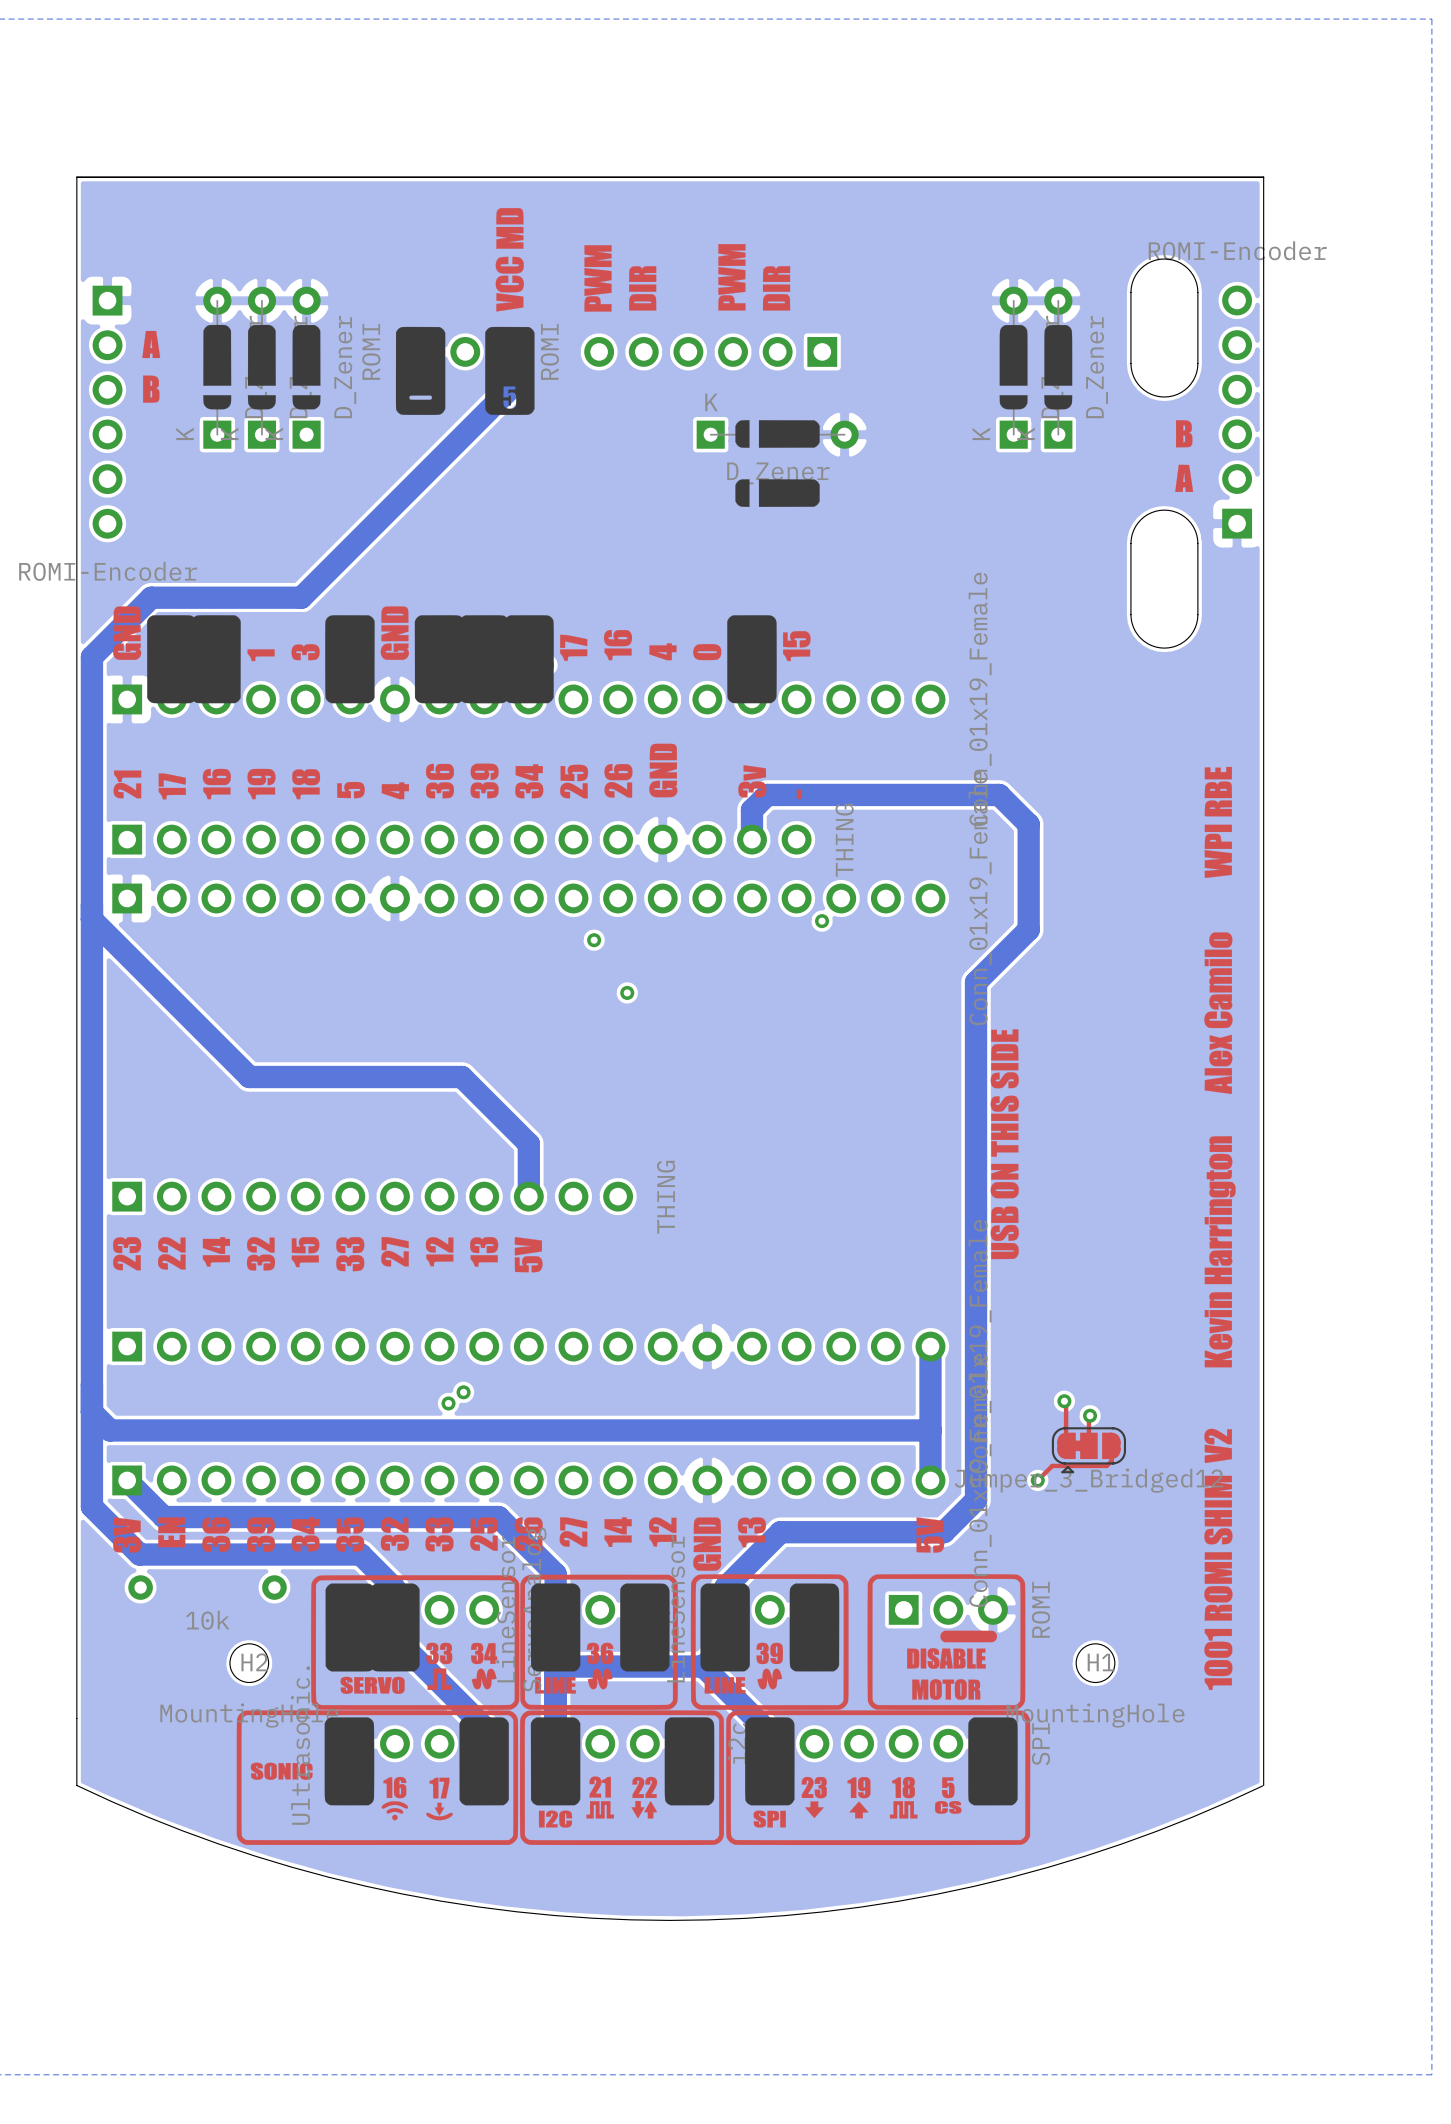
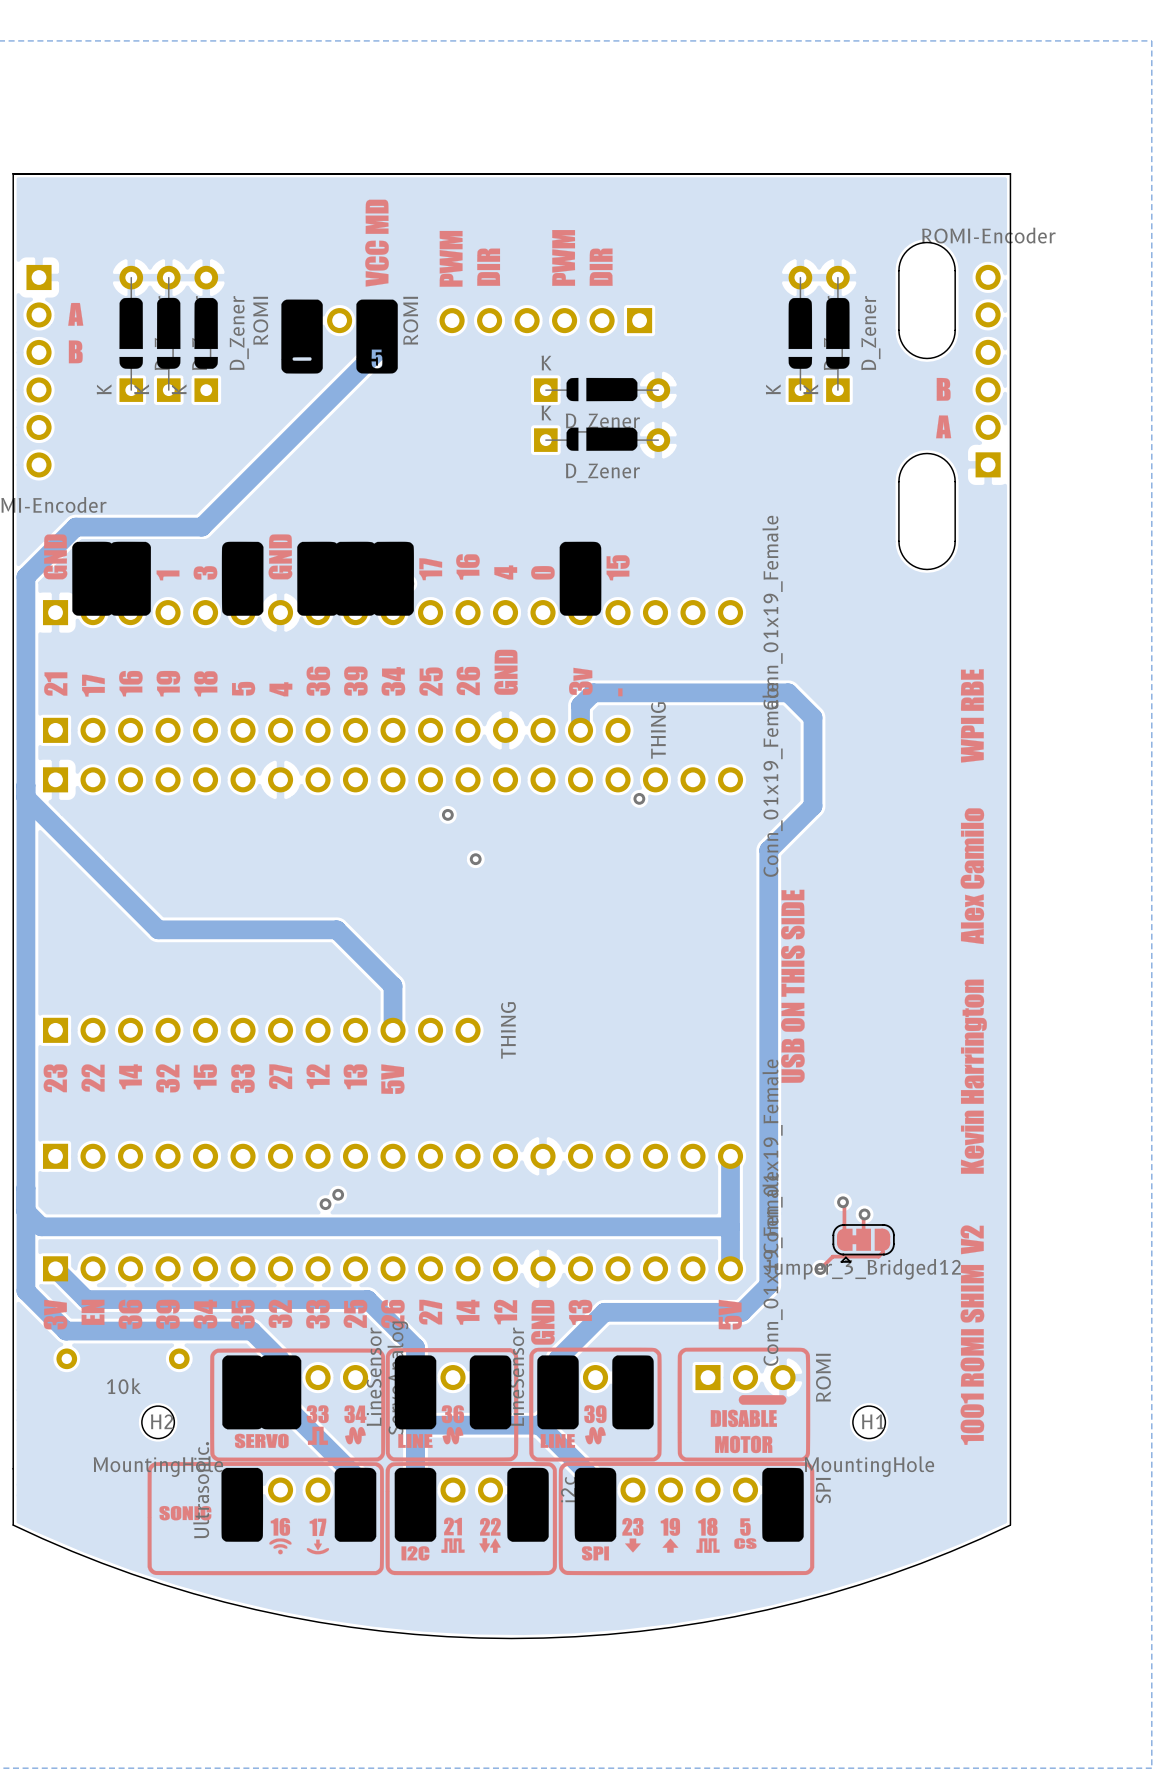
part: none -> D_Zener (602, 440)

